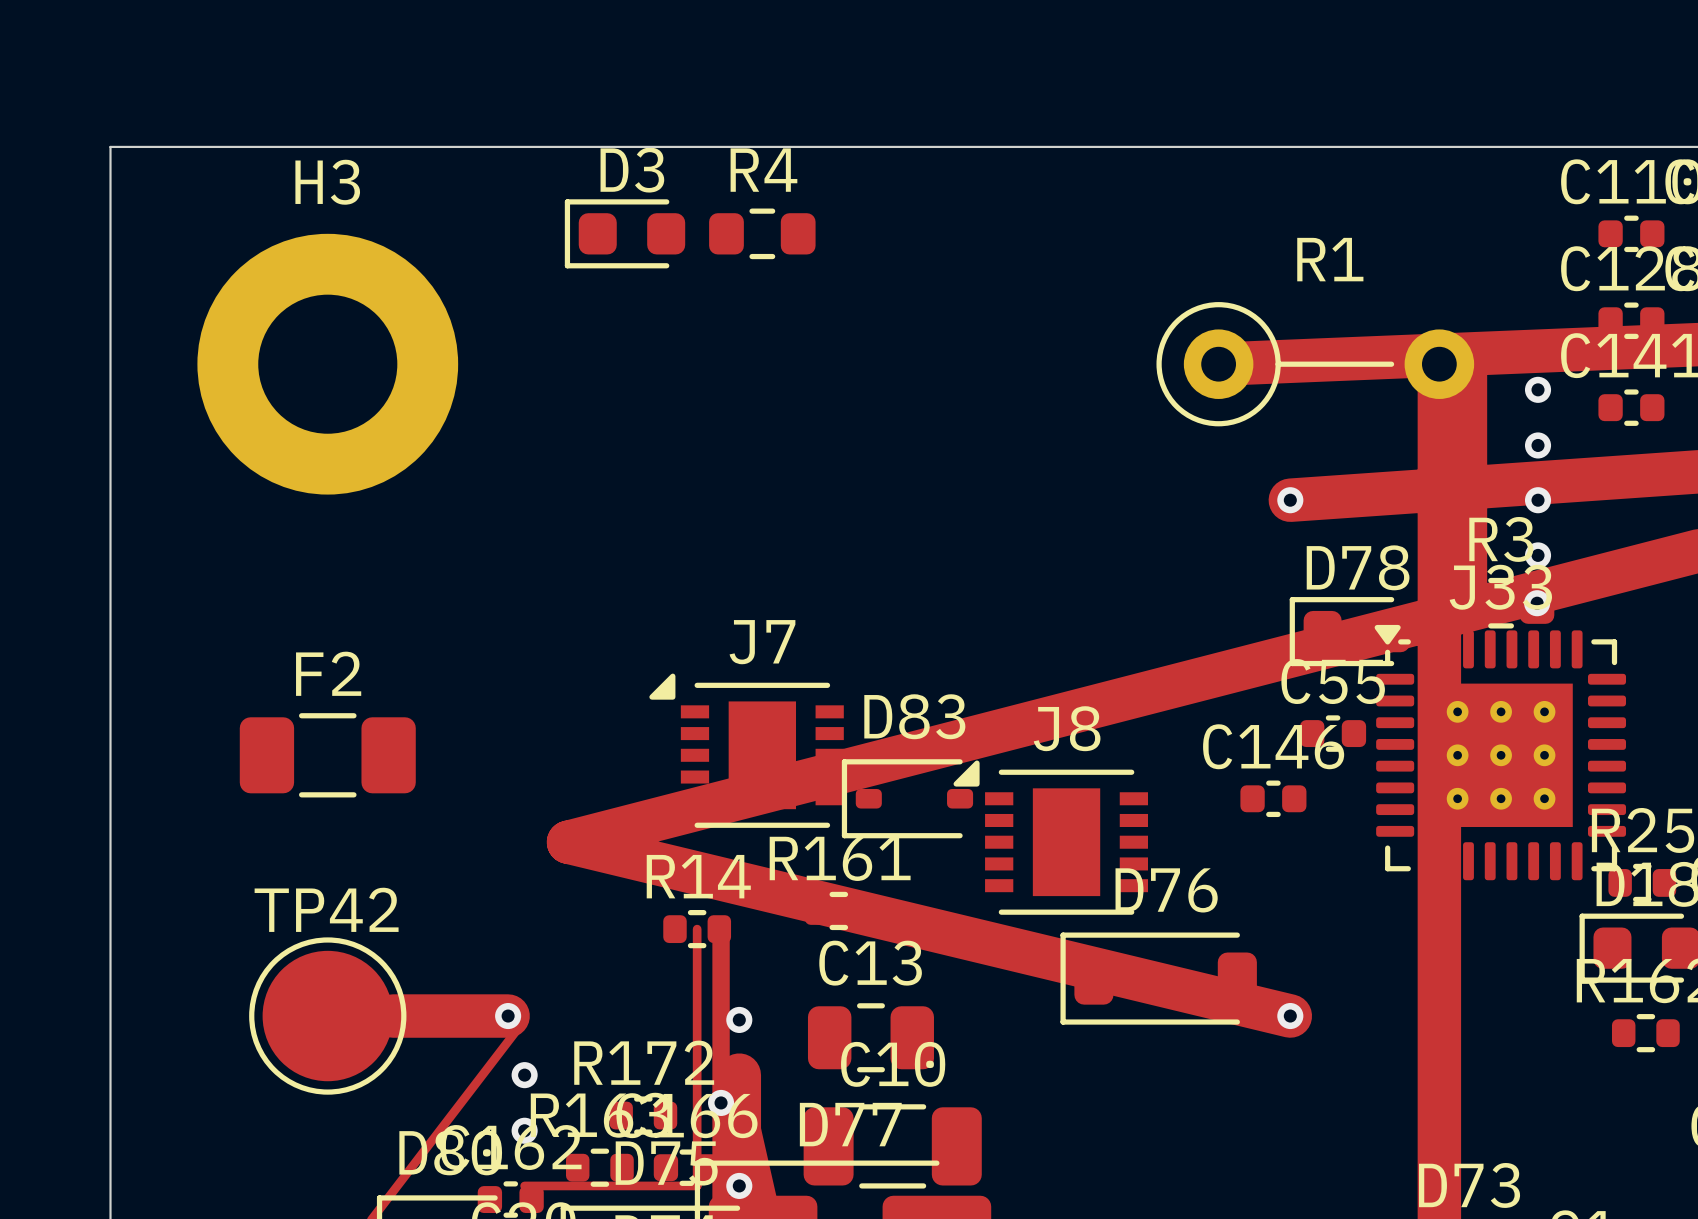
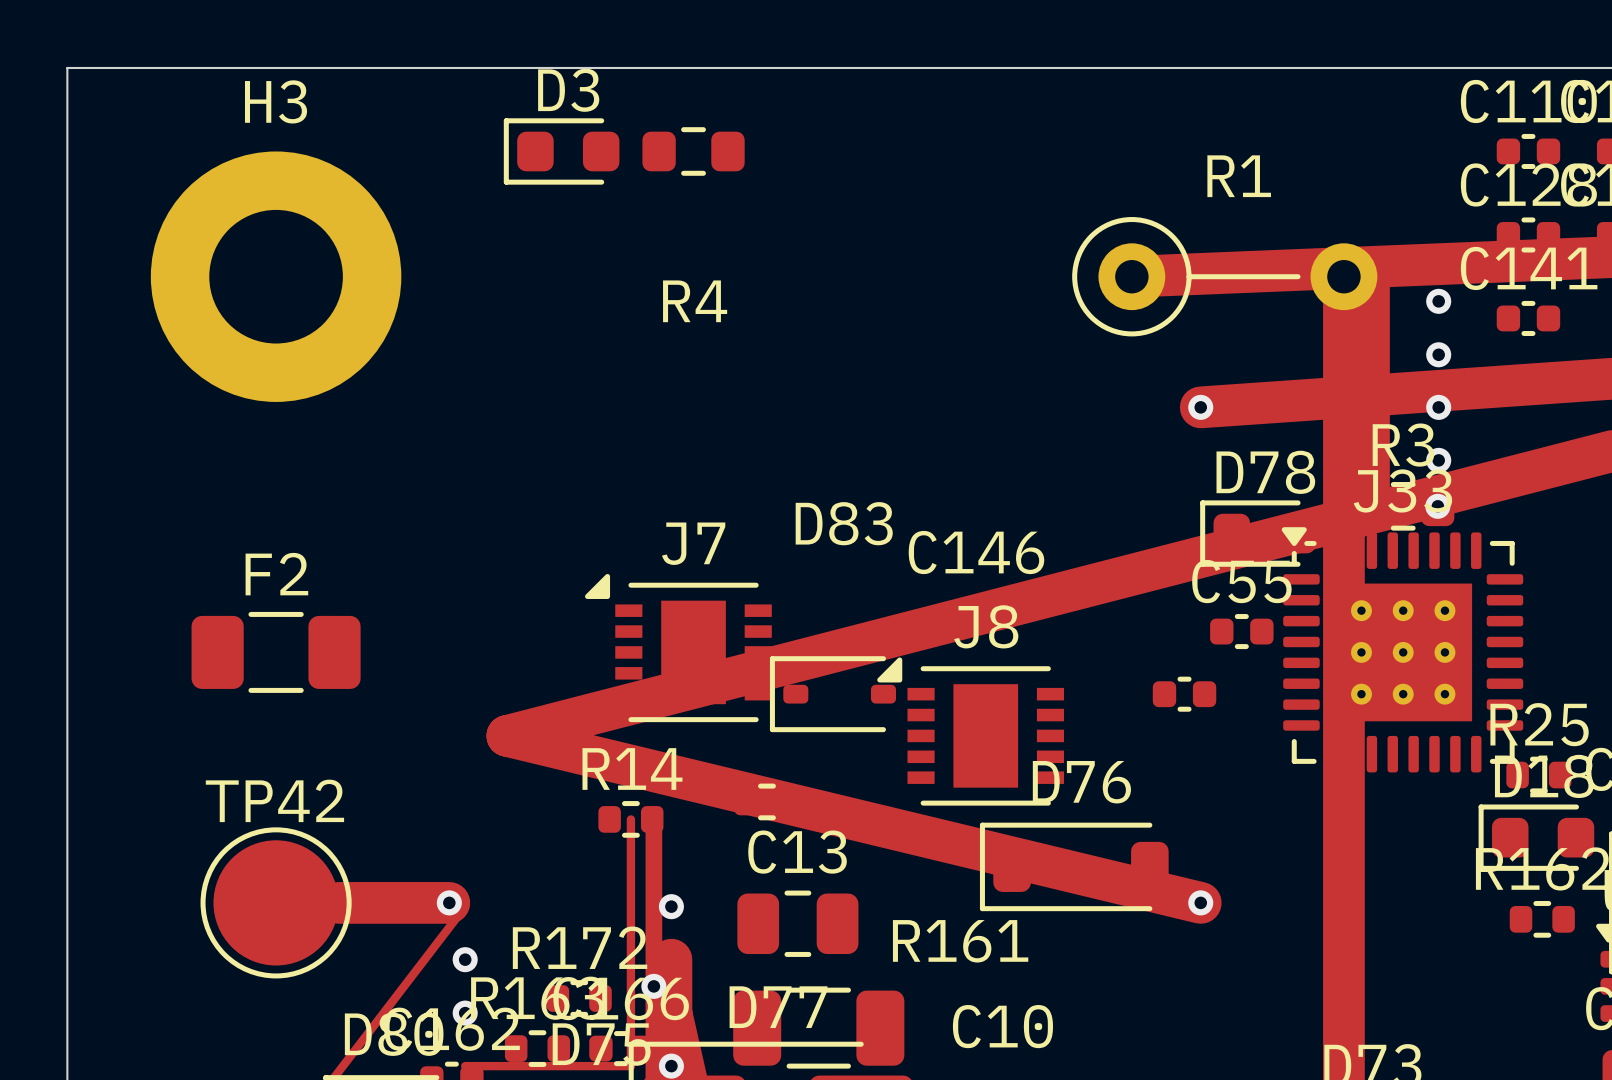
R4 name position: R4 (763, 170) -> R4 (695, 301)
D83 name position: D83 (914, 716) -> D83 (844, 523)
C146 name position: C146 (1273, 746) -> C146 (976, 552)
R161 name position: R161 (840, 858) -> R161 (960, 941)
C10 name position: C10 (893, 1064) -> C10 (1002, 1026)

